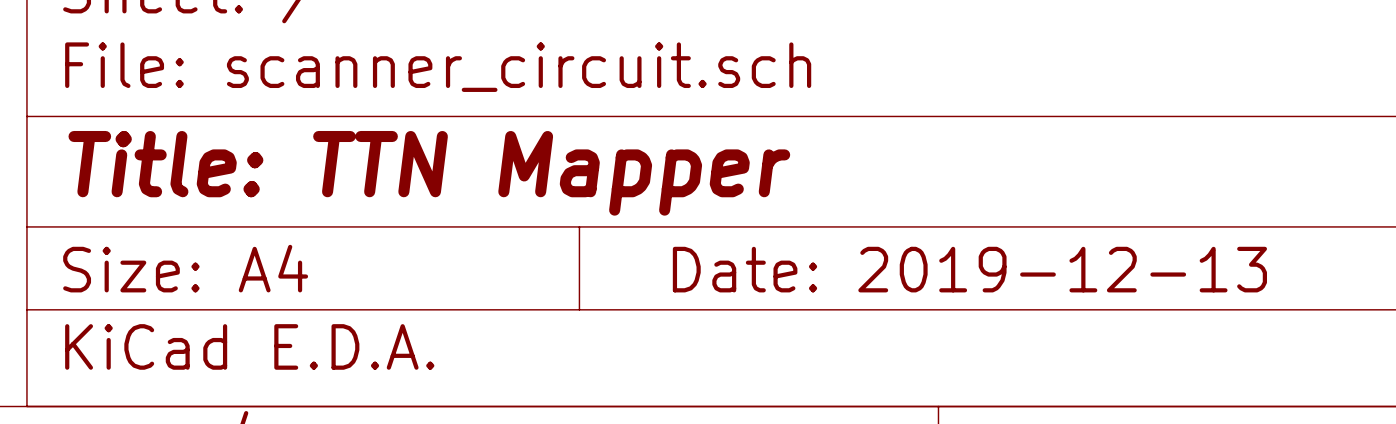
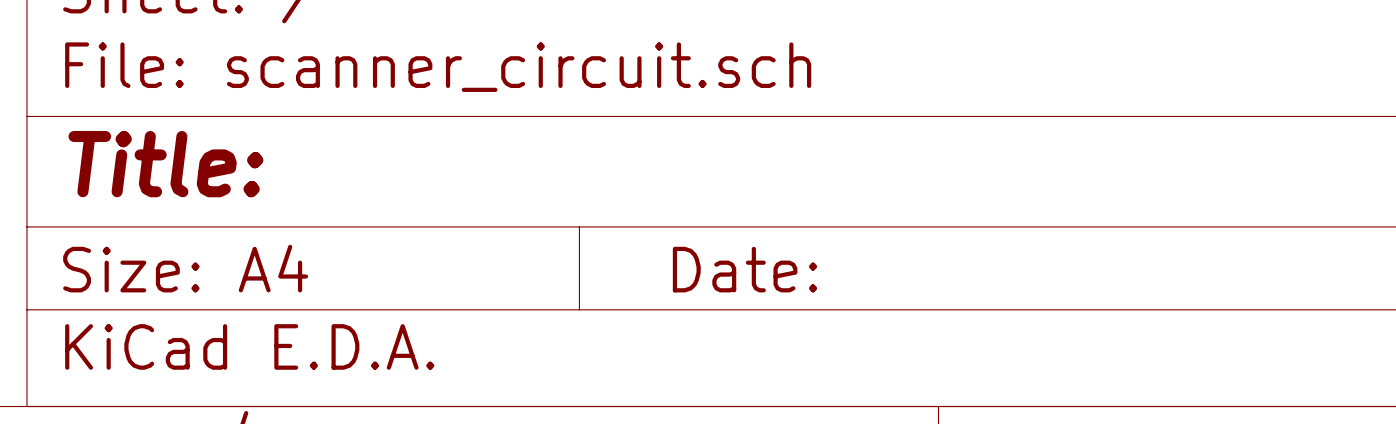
title block: Title: TTN Mapper (429, 173) -> Title: (165, 164)
title block: Date: 2019-12-13 (969, 269) -> Date: (744, 269)

